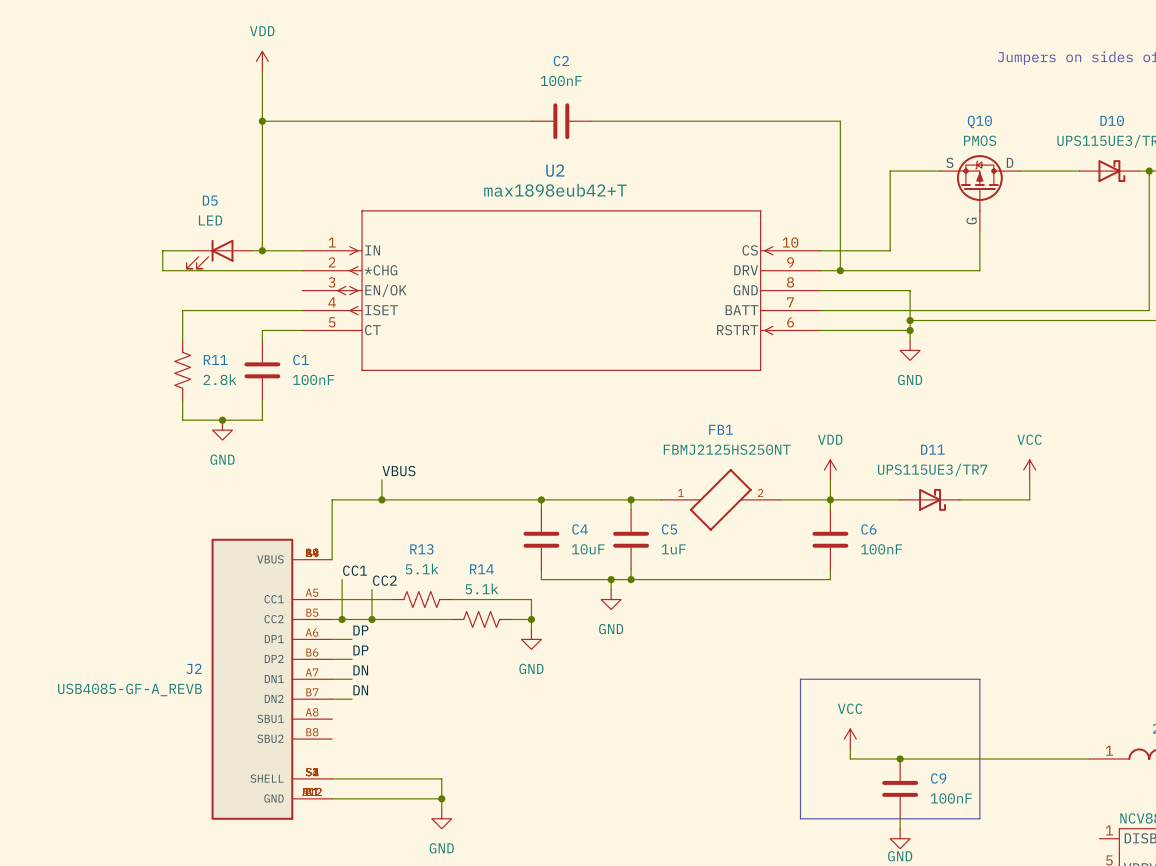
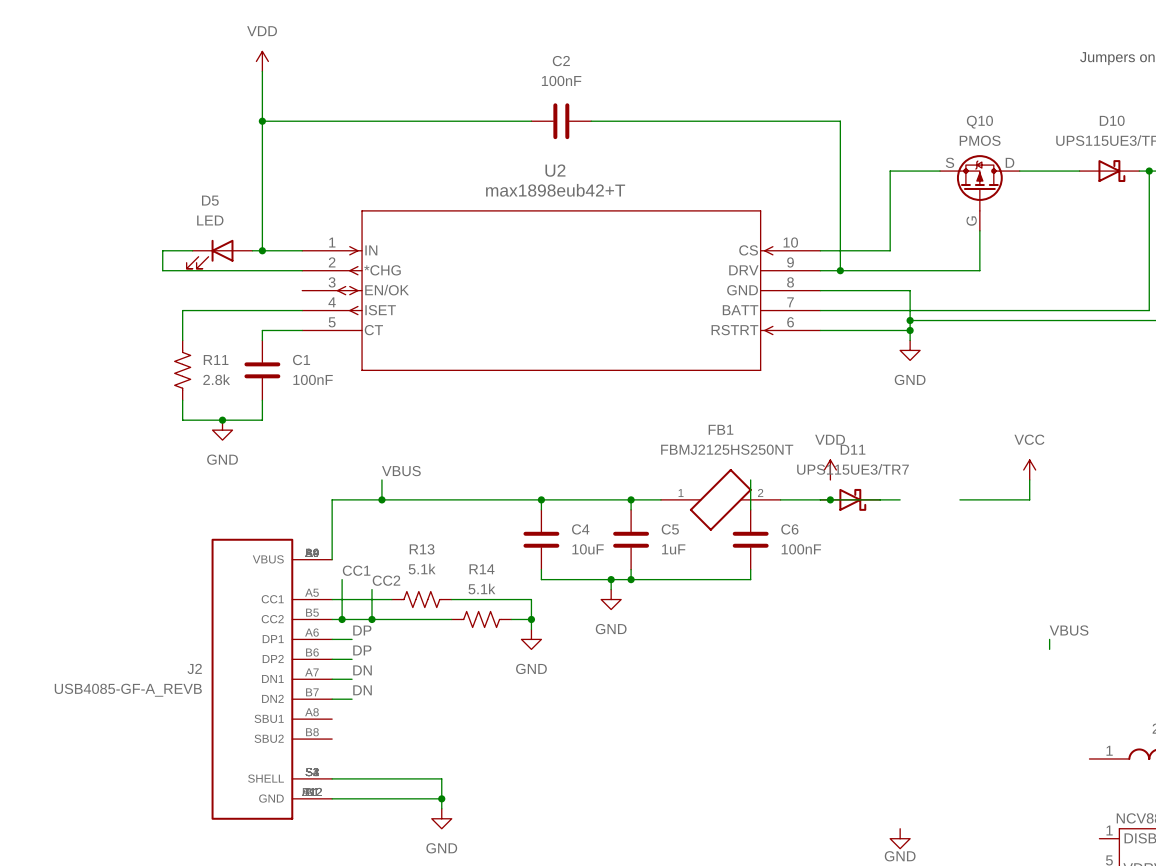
wire: (830, 479) (830, 509) -> (750, 479) (750, 509)
D11 position: (930, 499) -> (850, 499)
C6 position: (830, 539) -> (750, 539)
wire: (830, 569) (830, 579) (750, 579) -> (750, 569) (750, 579)
label: none -> VBUS (1069, 630)
wire: none -> (1049, 639) (1049, 649)
line: (800, 679) (979, 679) (979, 818) (800, 818) (800, 679) -> none
power symbol: VCC (850, 739) -> none
wire: (850, 749) (850, 758) (1089, 758) -> none
junction: (900, 758) -> none
C9: 100nF (900, 788) -> none
wire: (900, 818) (900, 828) -> none

